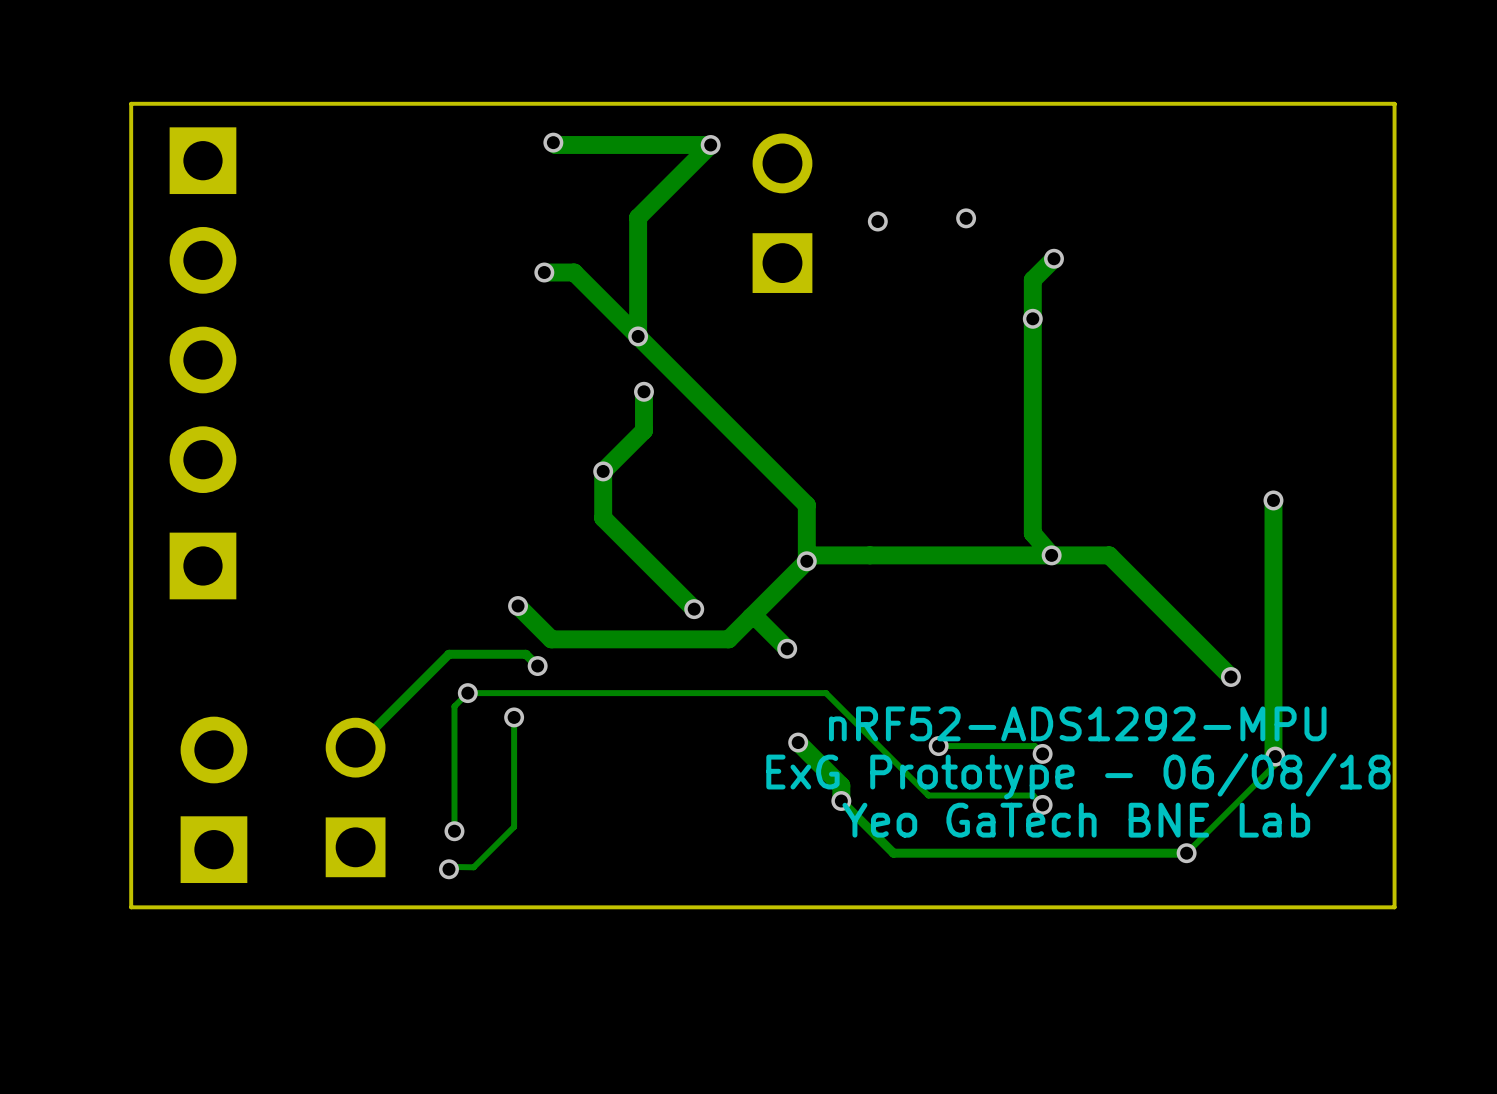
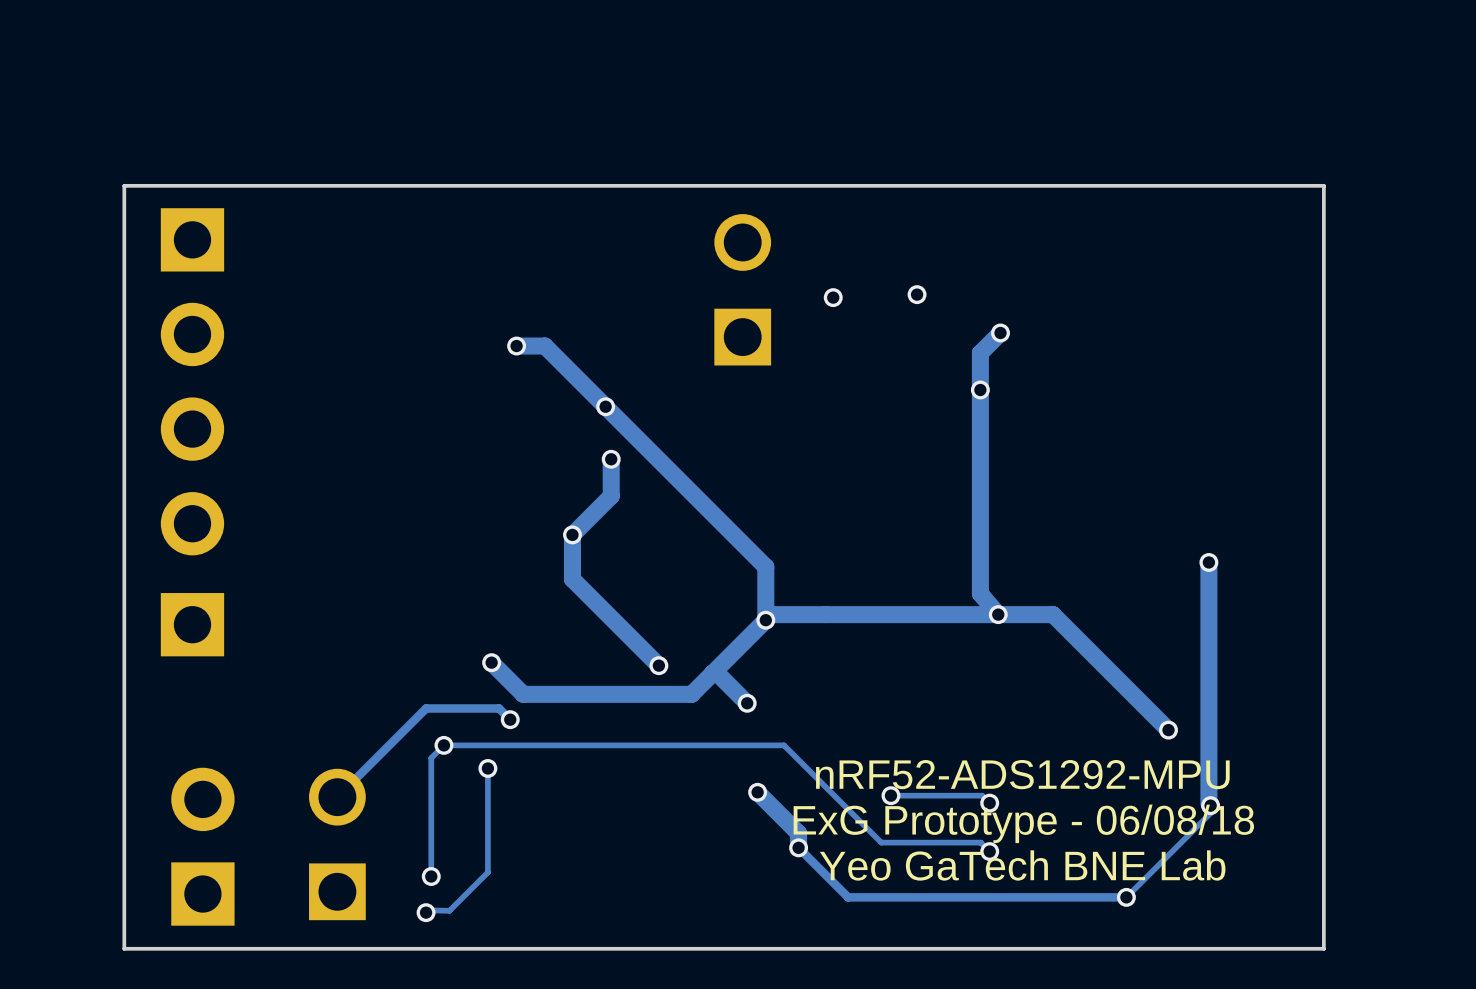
track: (553, 142) (555, 144) (710, 144) (638, 217) (638, 336) -> none
via: (553, 142) -> none
via: (710, 144) -> none

